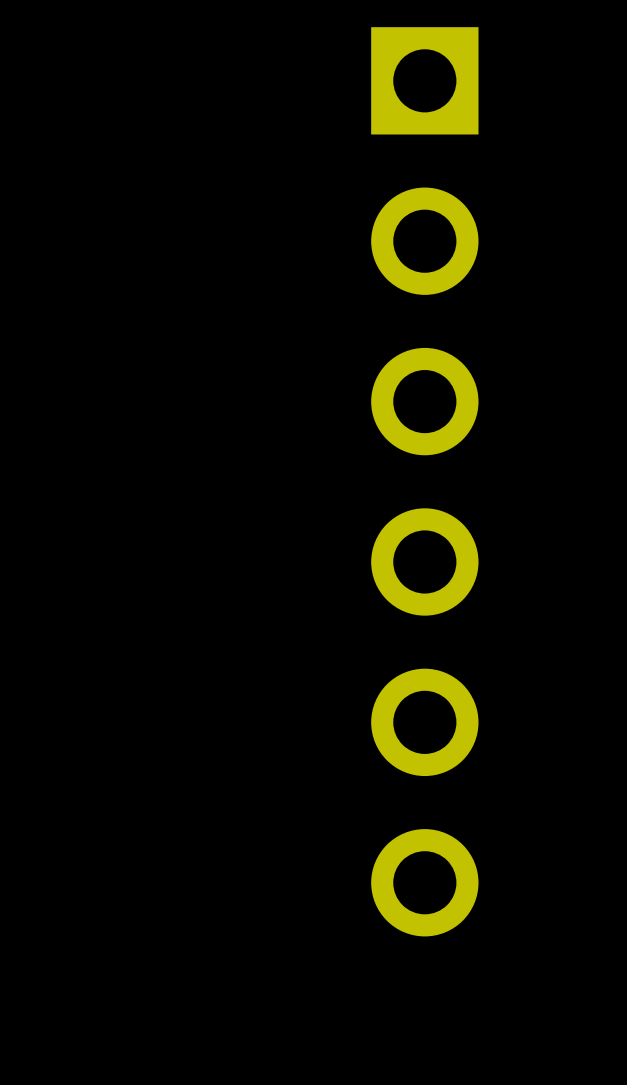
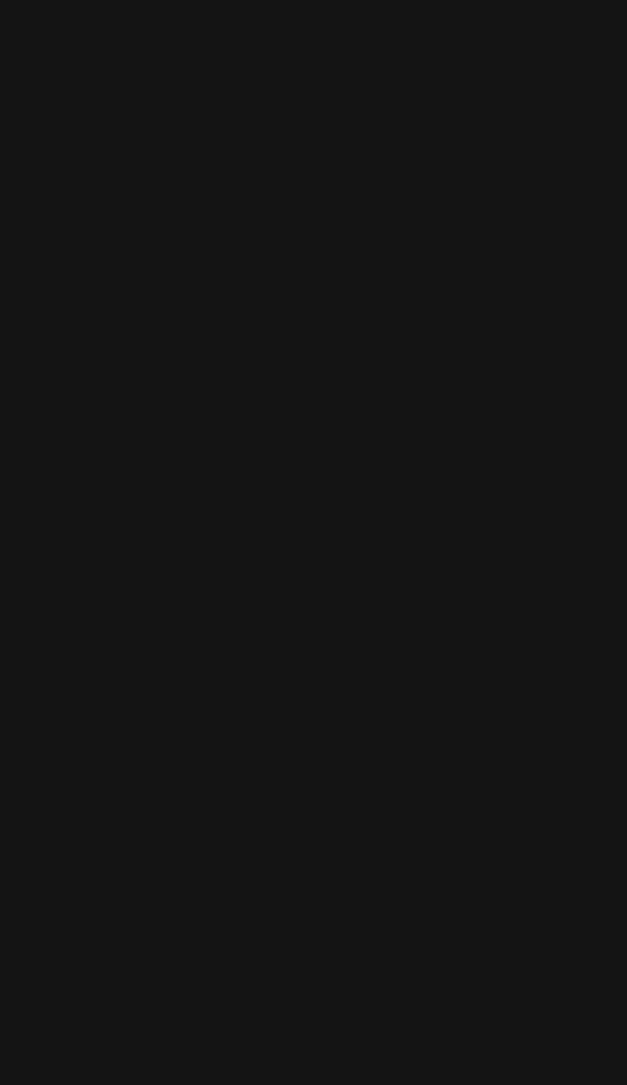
part: (424, 481) -> none

